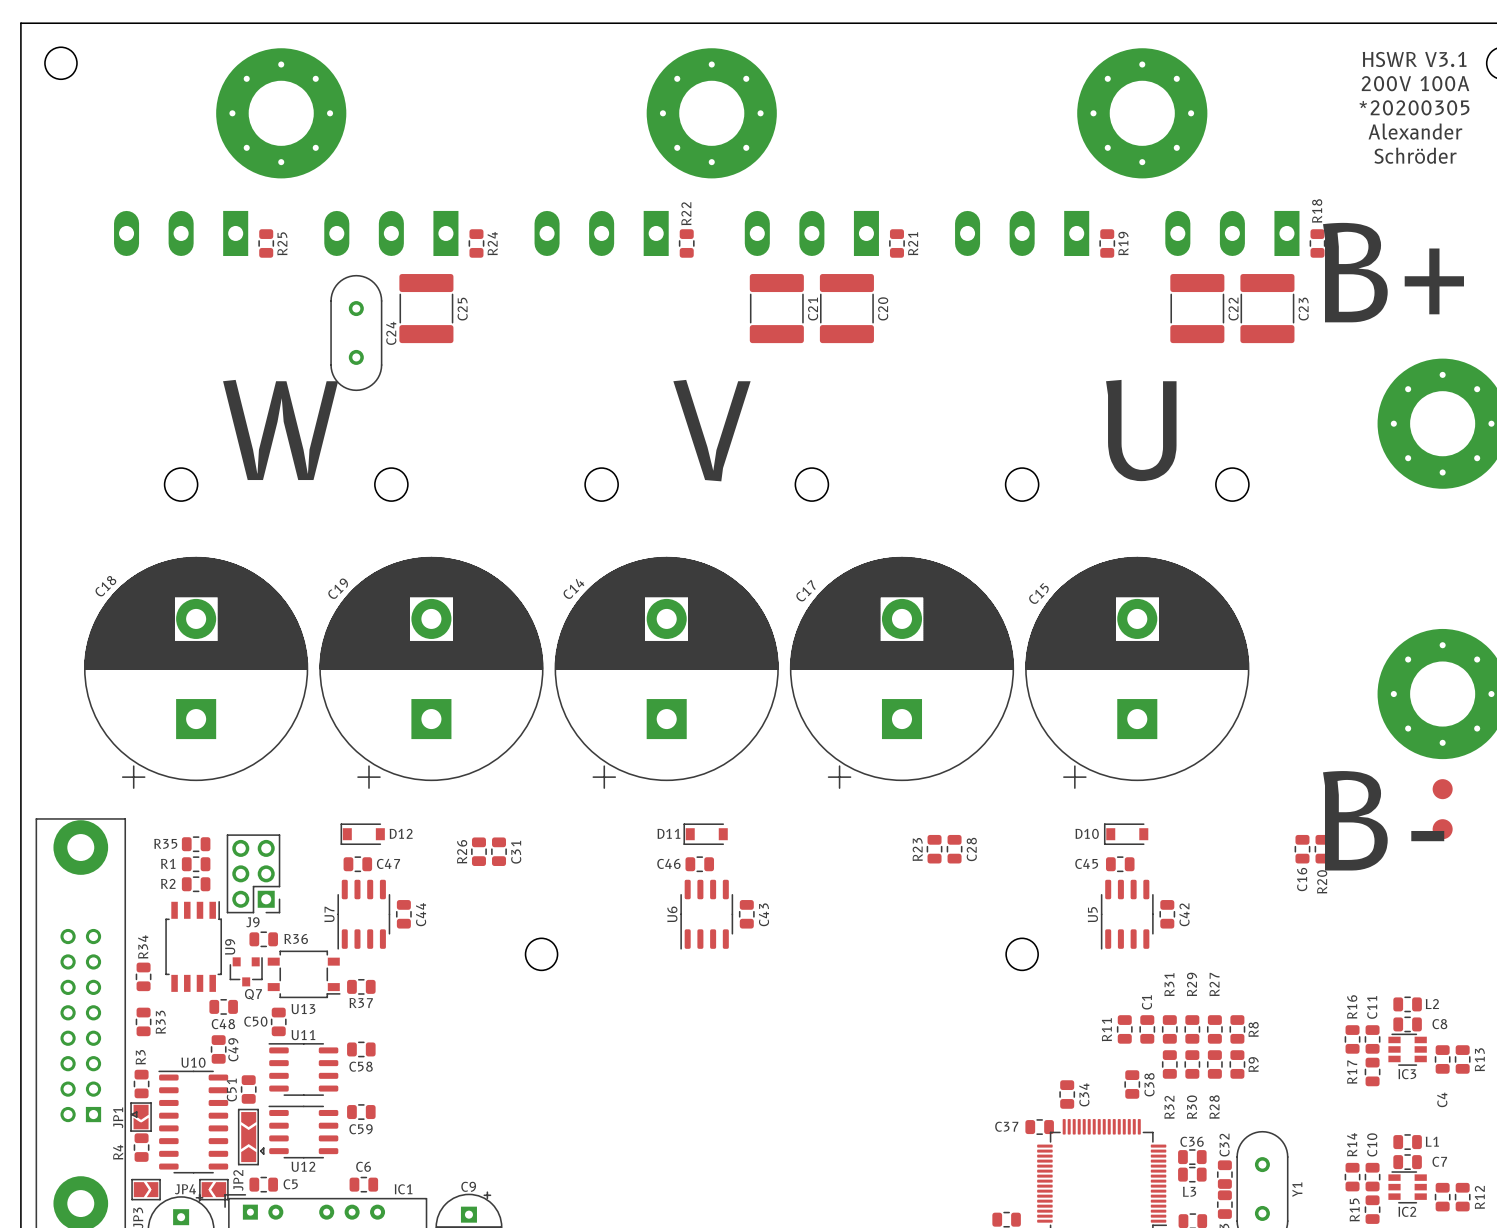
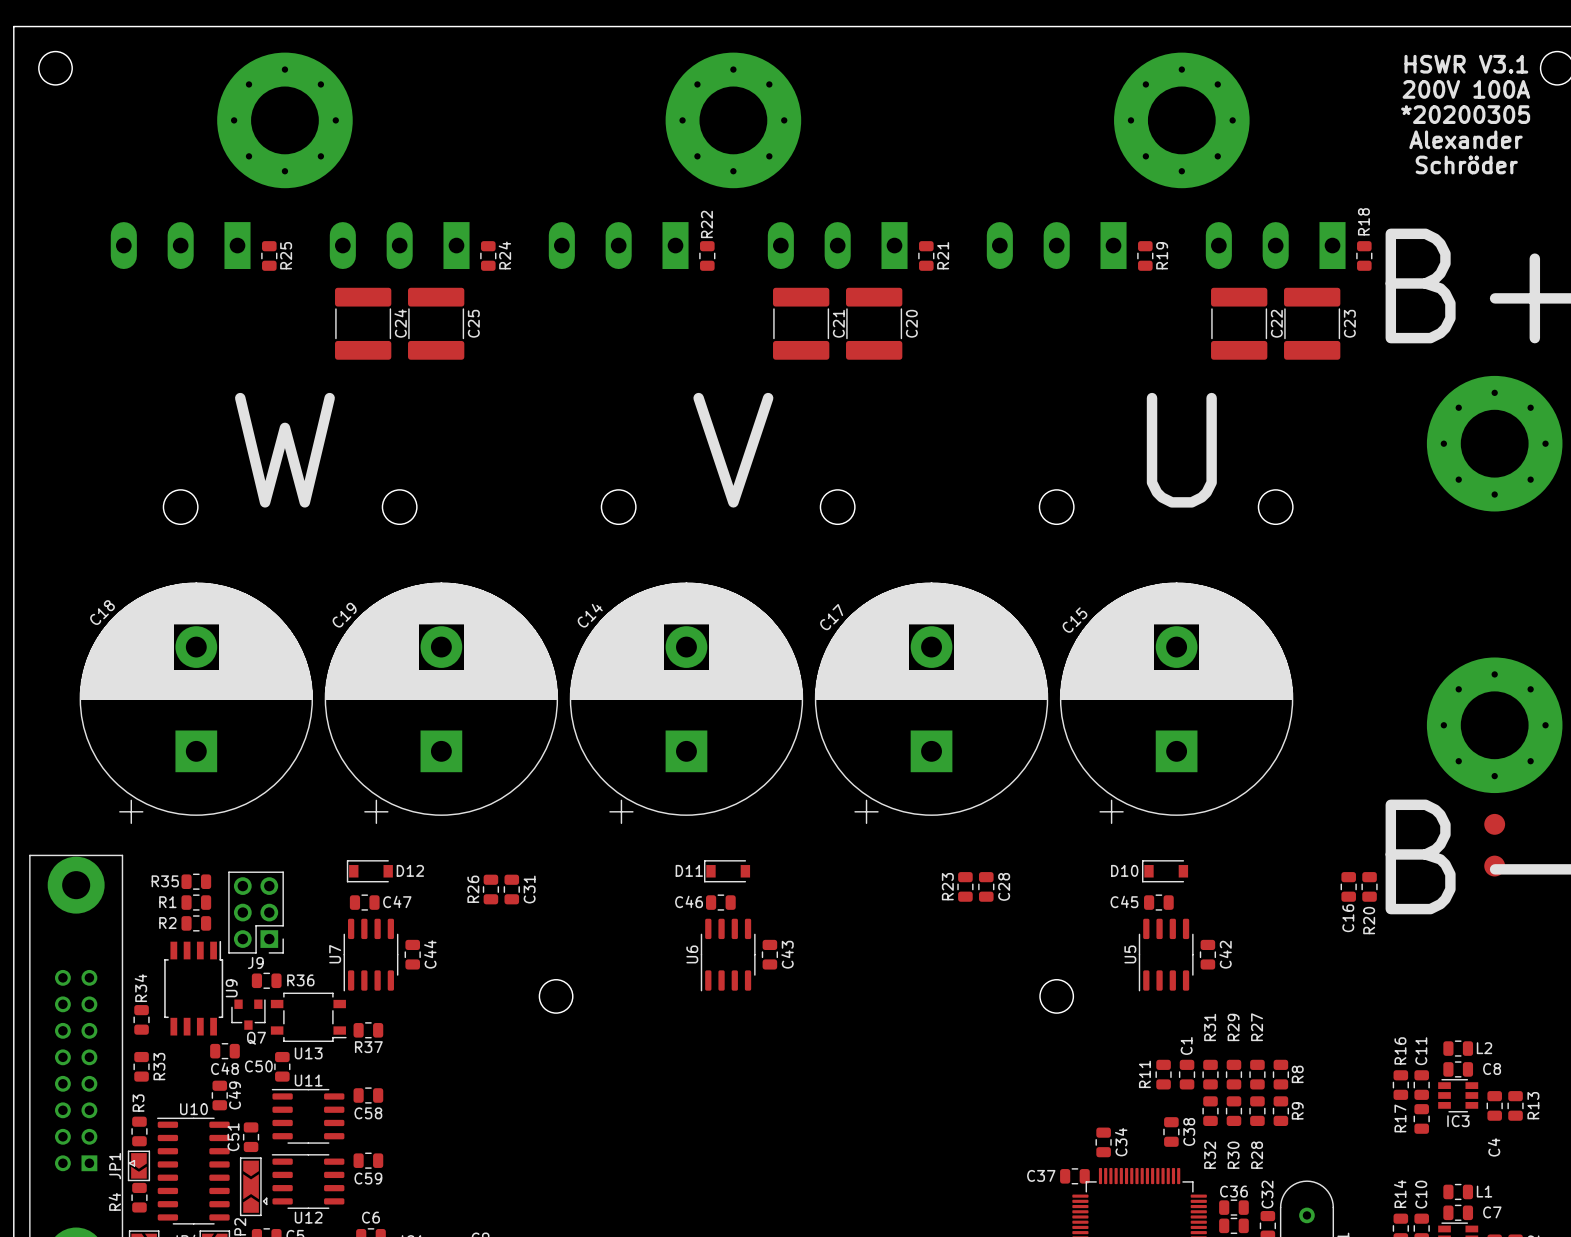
C24 footprint: [330, 275, 383, 391] -> [335, 287, 392, 360]

